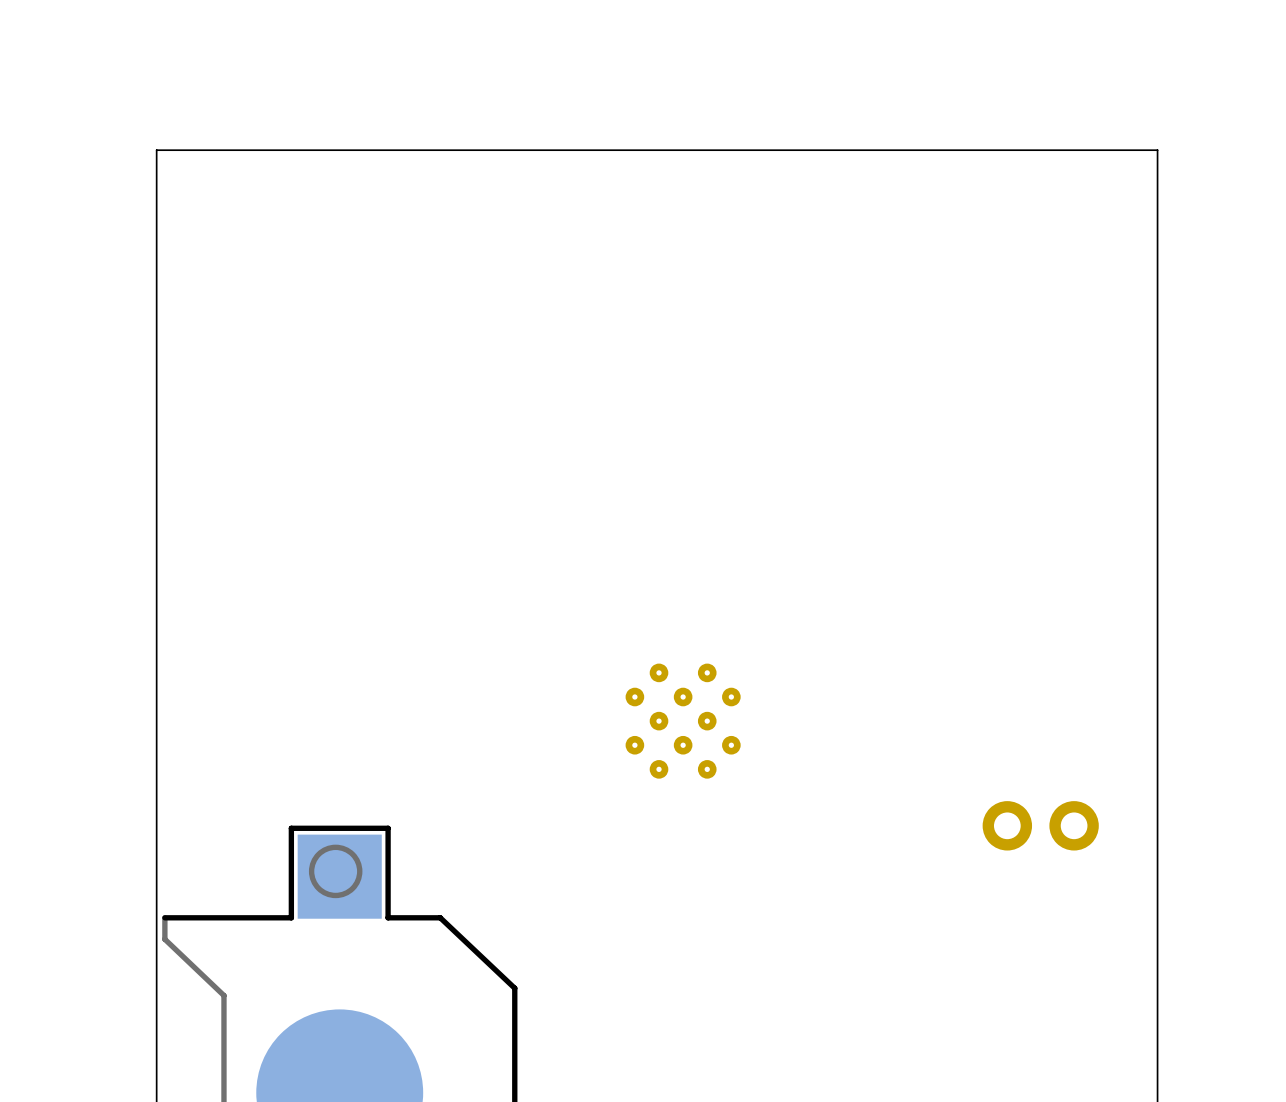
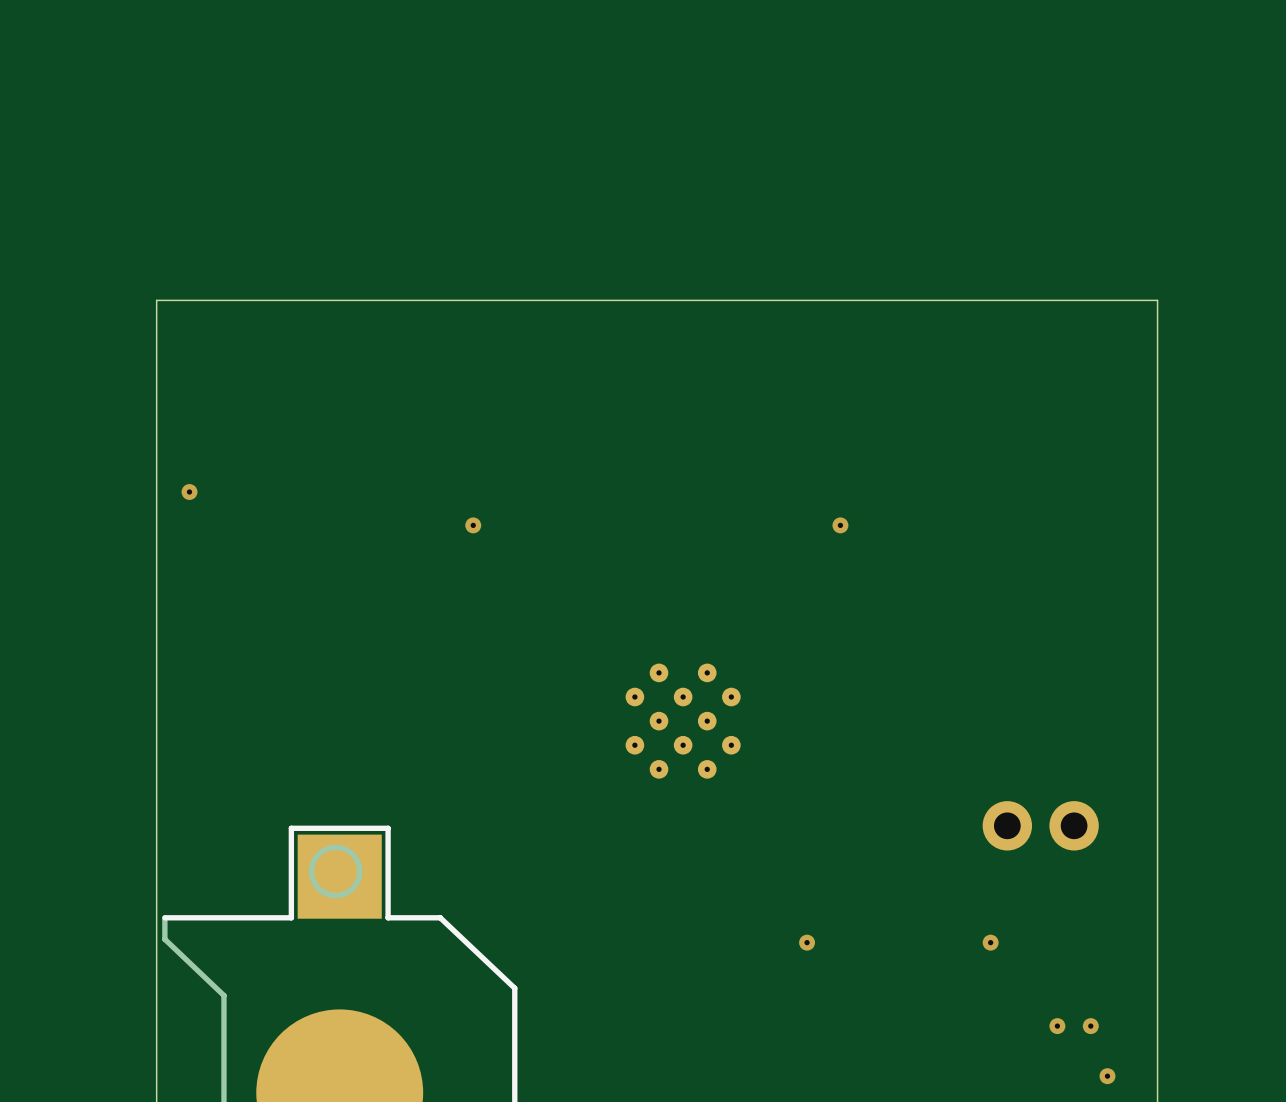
board edge: (1157, 300) (1157, 150) (156, 150) (156, 300) -> (1157, 300) (156, 300)
via: none -> (189, 492)
via: none -> (473, 525)
via: none -> (840, 525)
via: none -> (807, 942)
via: none -> (990, 942)
via: none -> (1057, 1026)
via: none -> (1090, 1026)
via: none -> (1107, 1076)

